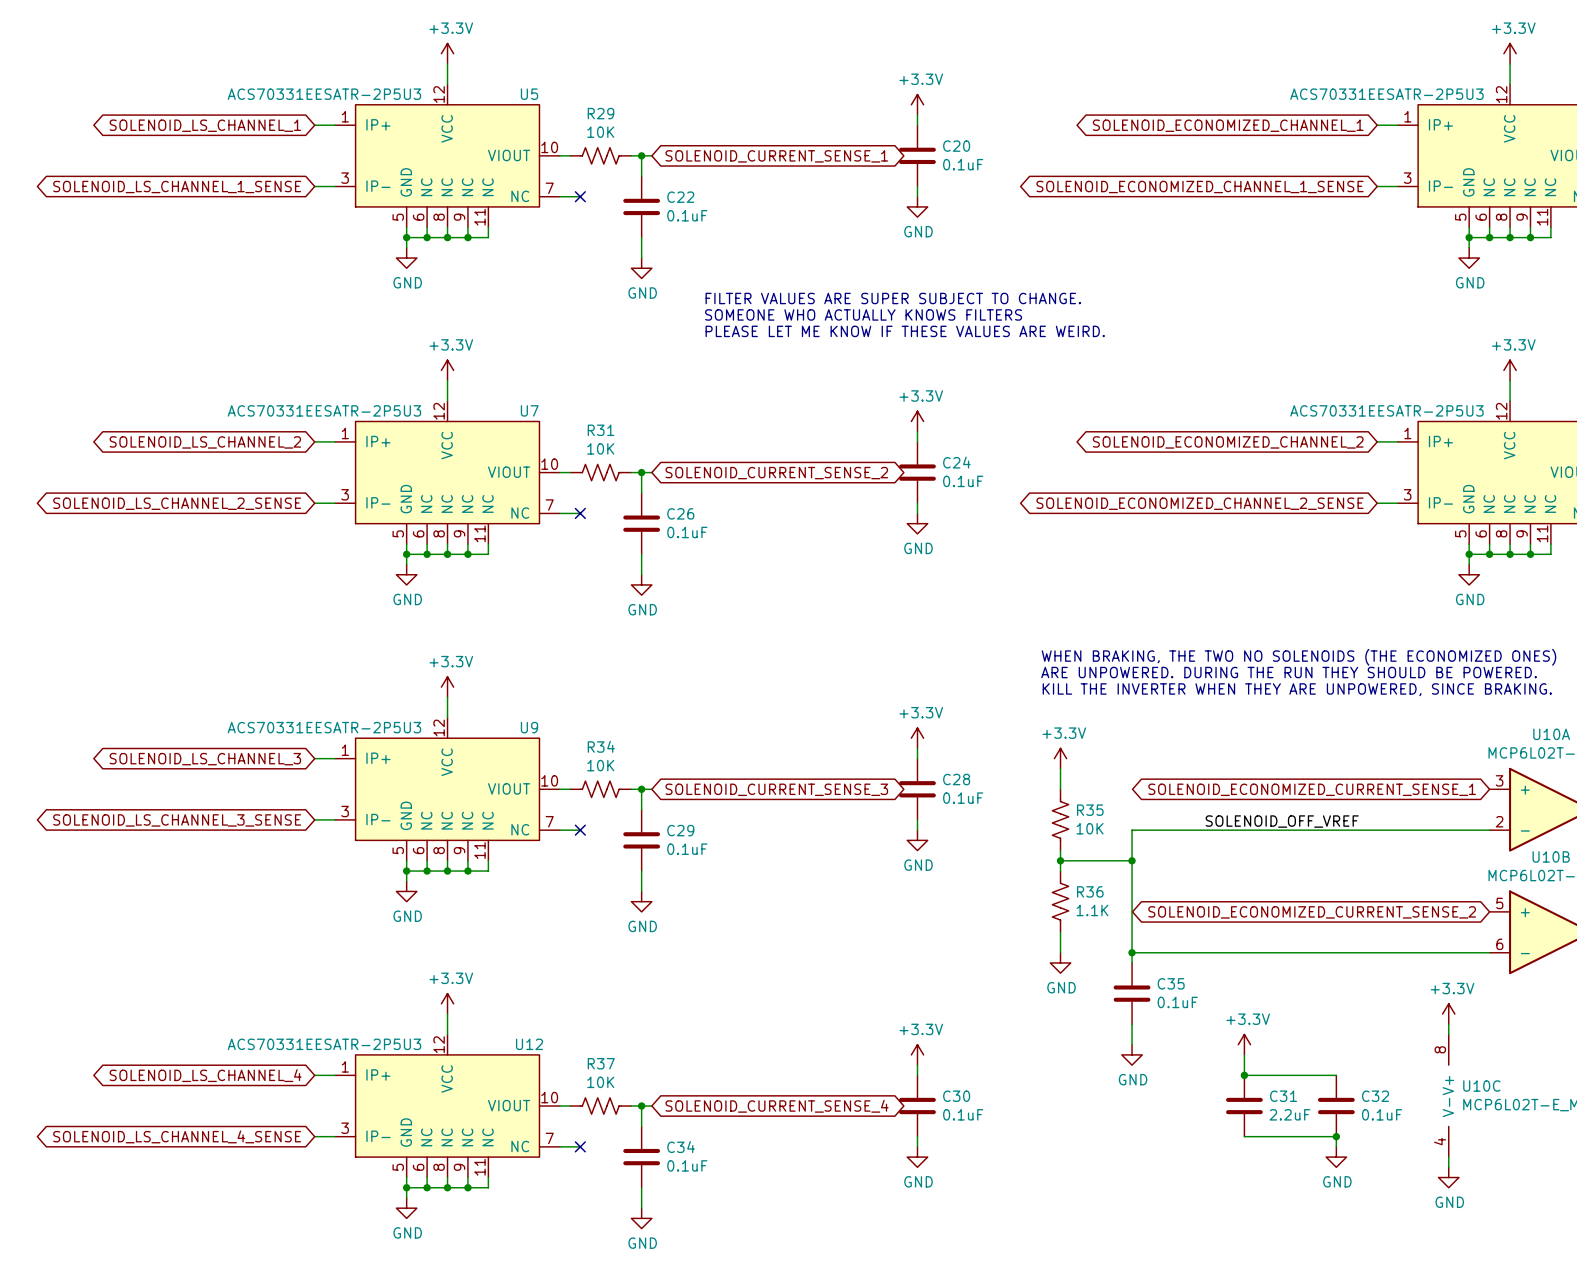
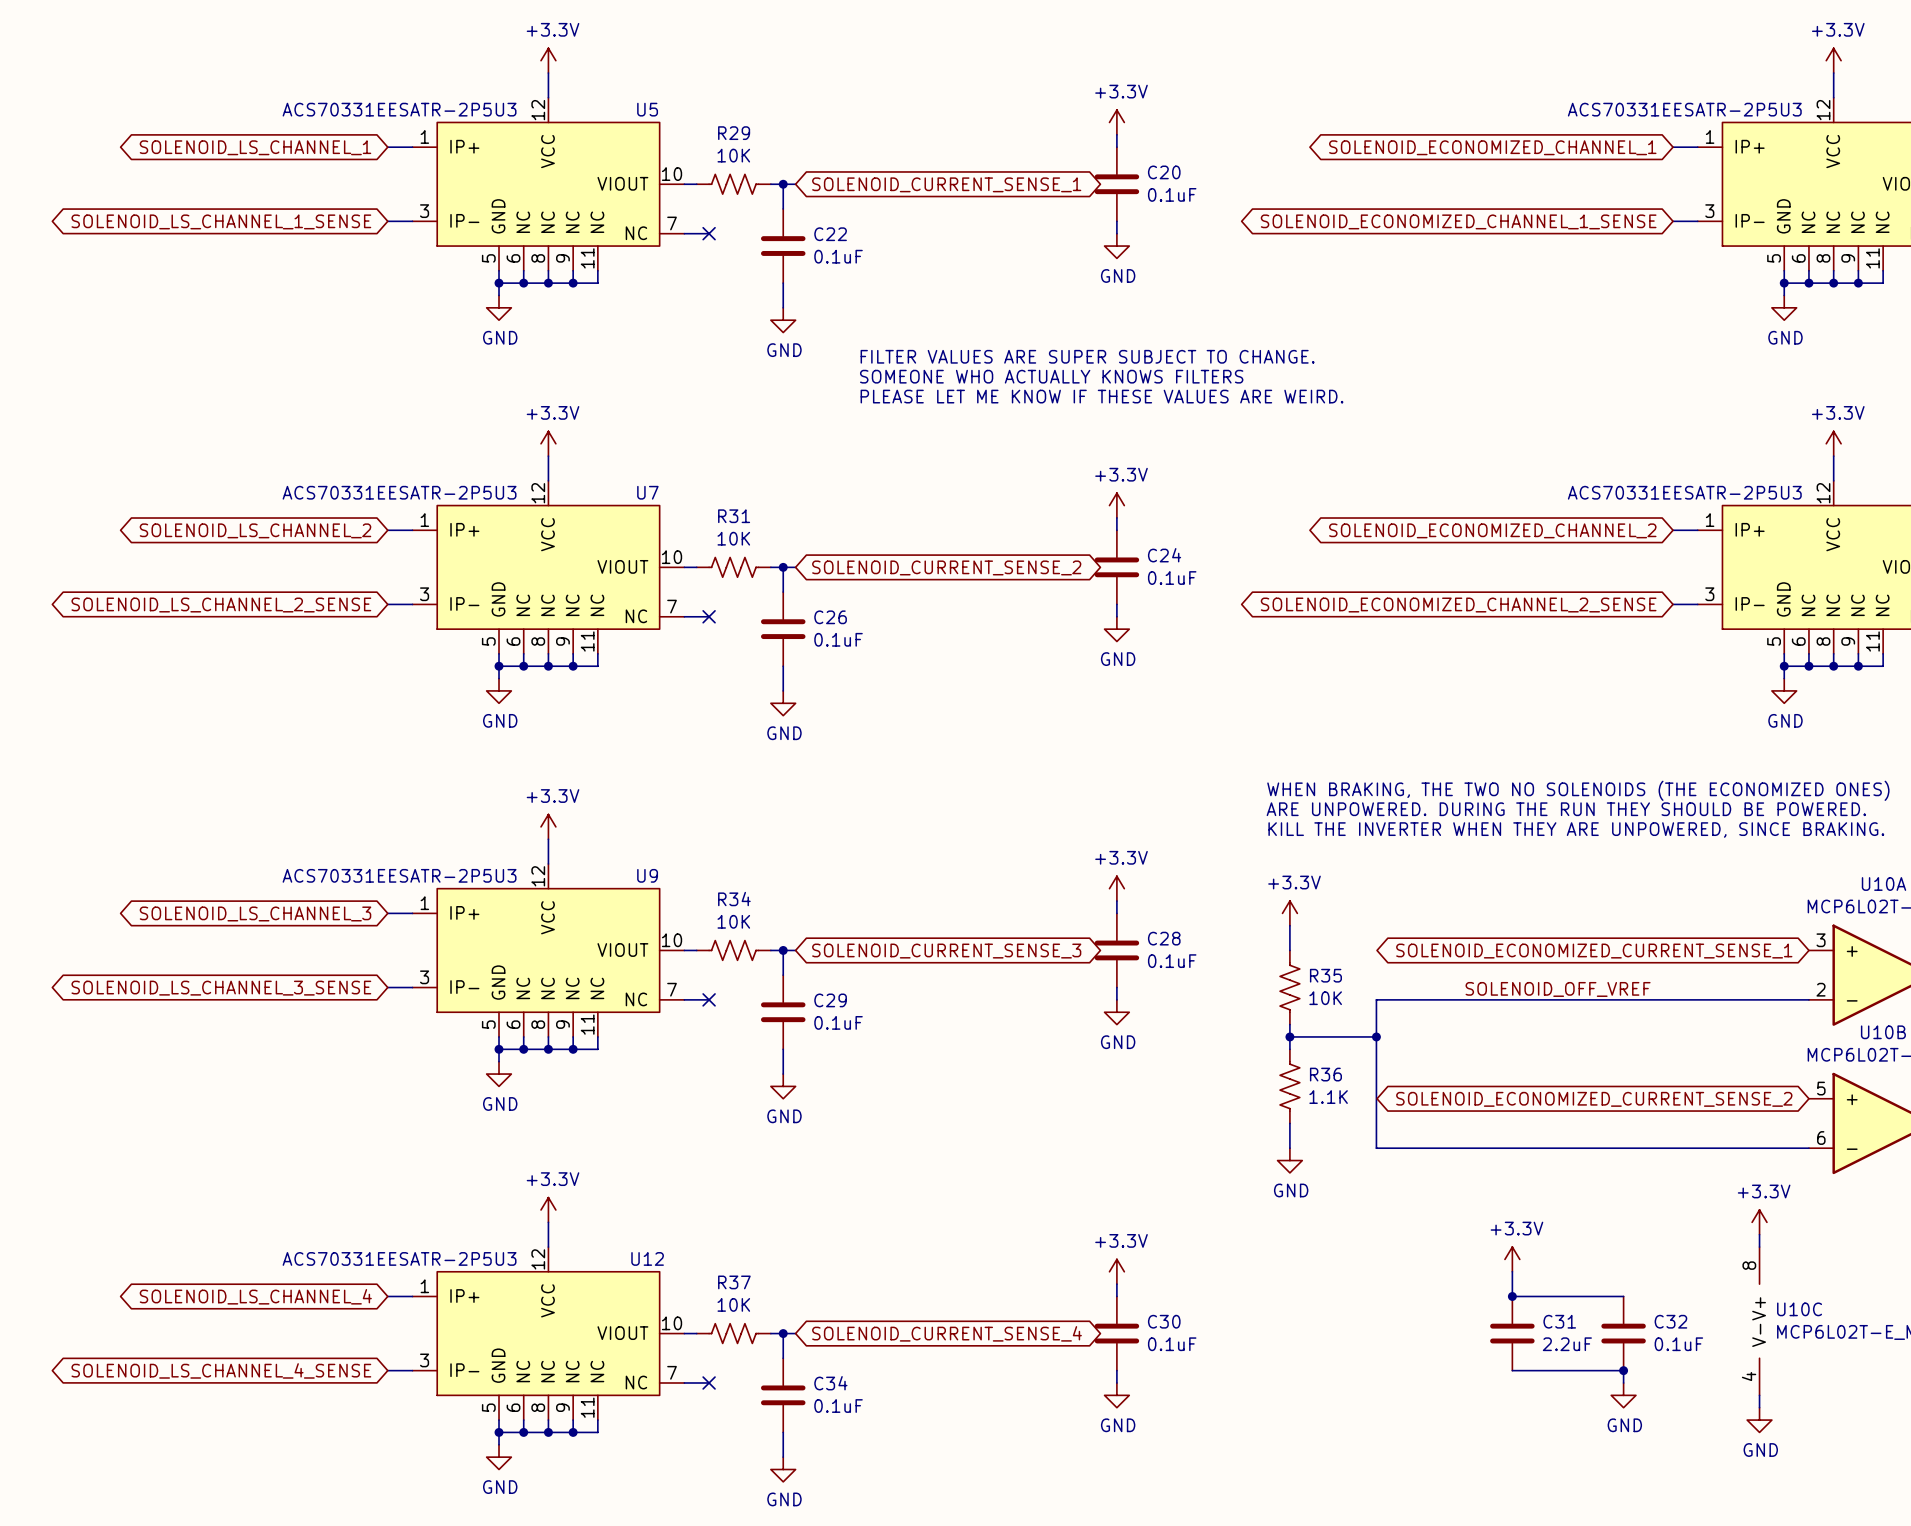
wire: (1132, 952) (1132, 962) -> none
junction: (1132, 952) -> none
C35: 0.1uF (1132, 993) -> none
wire: (1132, 1024) (1132, 1044) -> none
power symbol: GND (1132, 1054) -> none

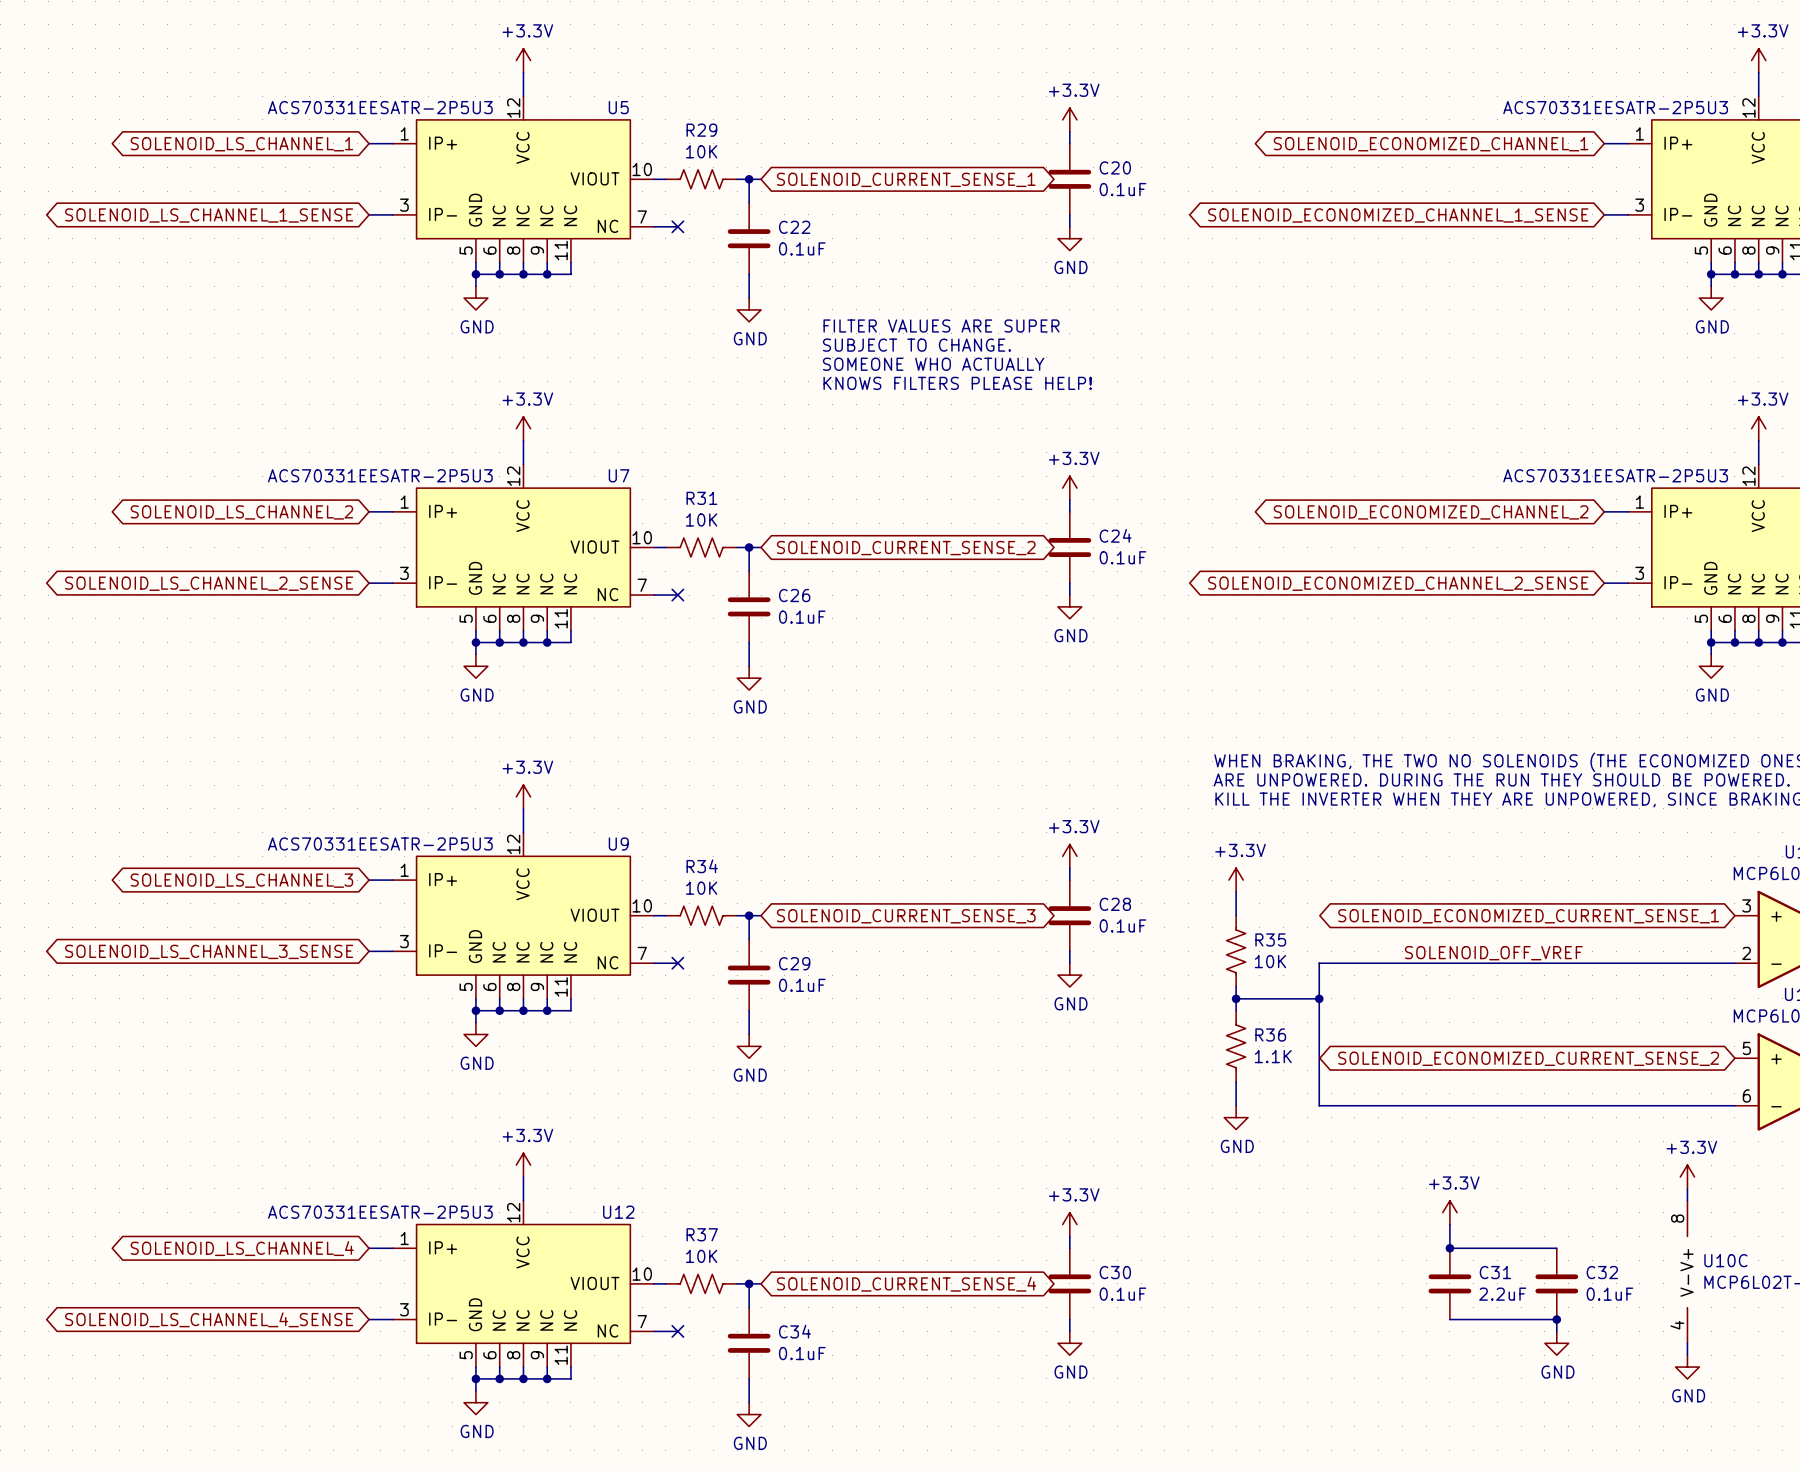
text: none -> FILTER VALUES ARE SUPER (941, 326)
text: FILTER VALUES ARE SUPER SUBJECT TO CHANGE. (1087, 356) -> SUBJECT TO CHANGE. (916, 345)
text: SOMEONE WHO ACTUALLY KNOWS FILTERS (1051, 376) -> SOMEONE WHO ACTUALLY (933, 364)
text: PLEASE LET ME KNOW IF THESE VALUES ARE WEIRD. (1101, 396) -> KNOWS FILTERS PLEASE HELP! (957, 383)

